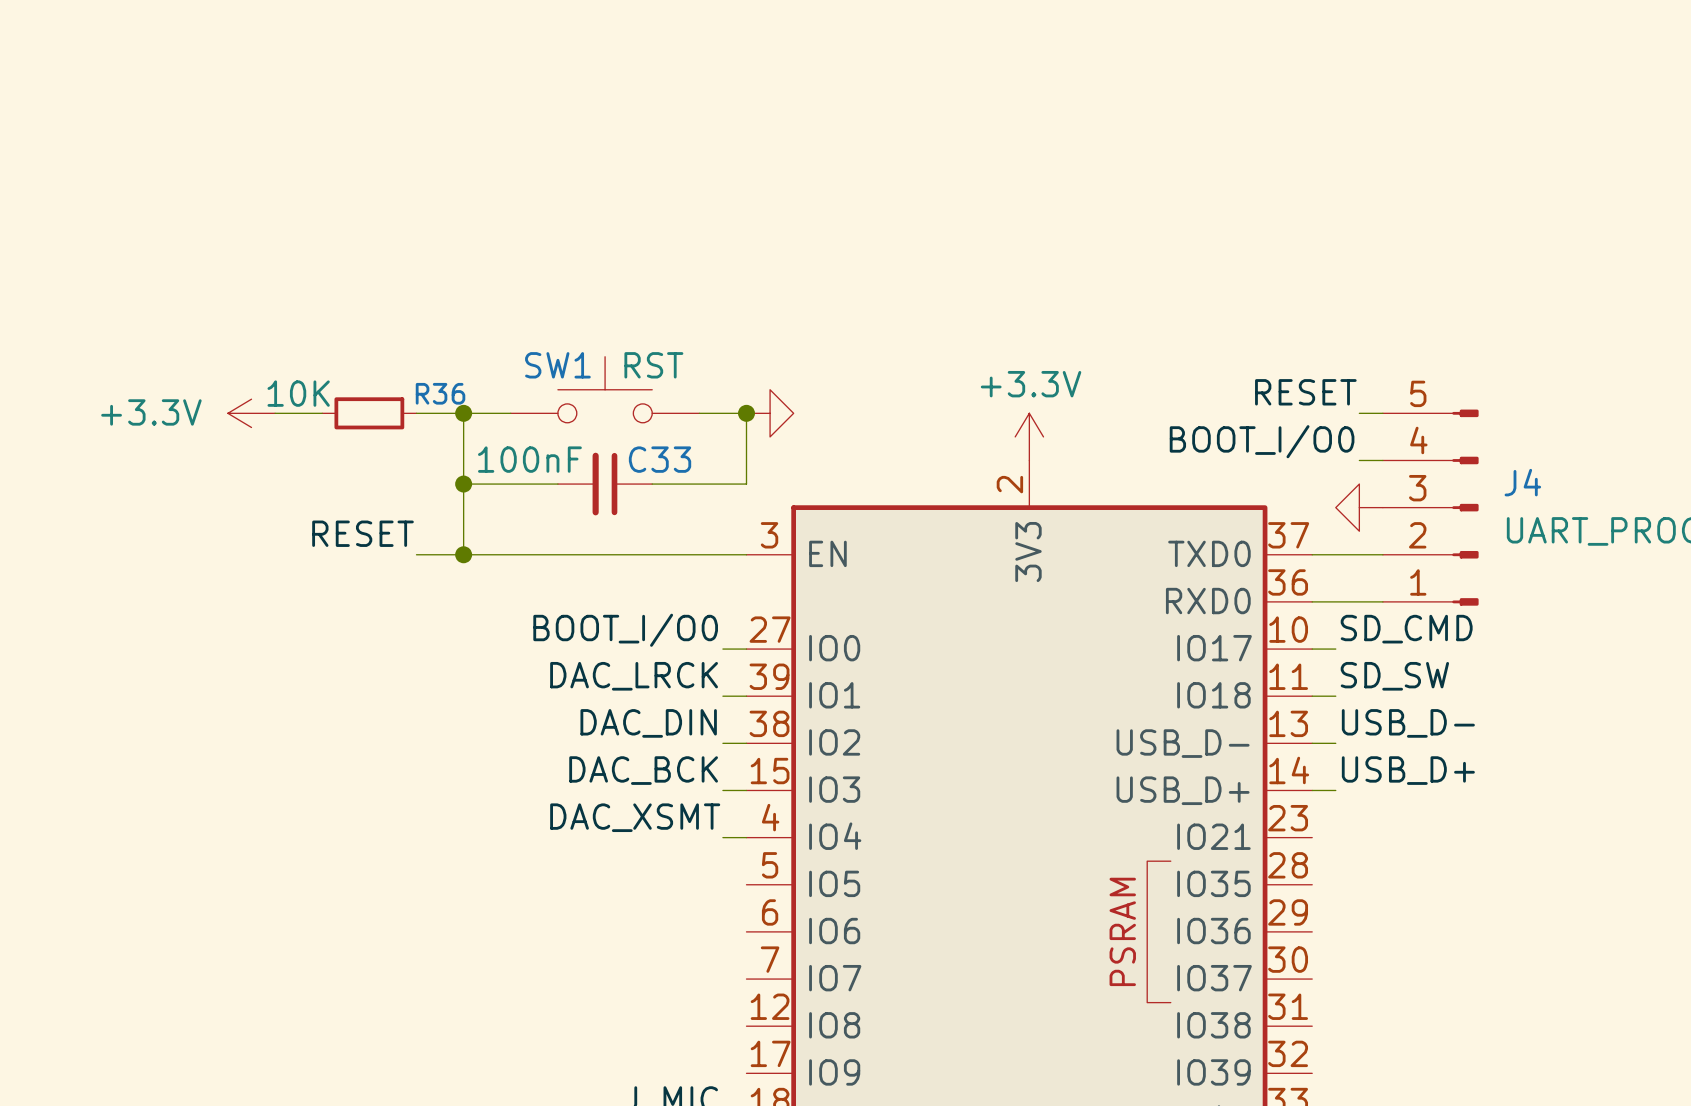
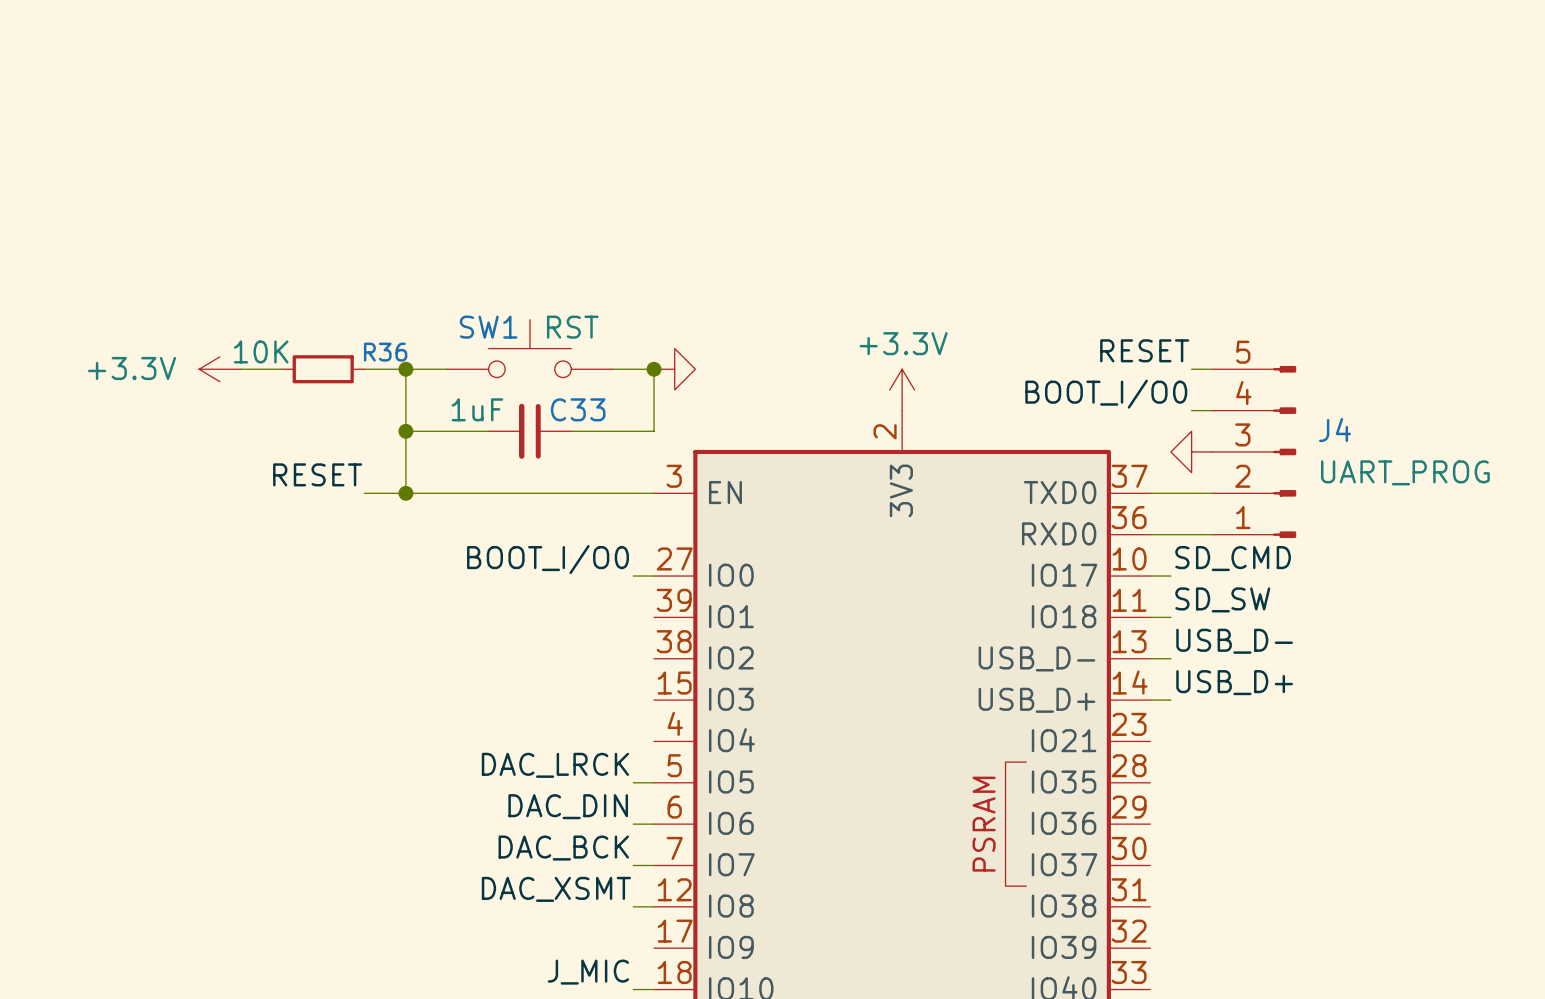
C33 value: 100nF (529, 459) -> 1uF (477, 409)
label position: DAC_LRCK (634, 676) -> DAC_LRCK (555, 765)
wire: (722, 696) (746, 696) -> (633, 906) (654, 906)
label position: DAC_DIN (648, 723) -> DAC_DIN (568, 806)
wire: (722, 743) (746, 743) -> (633, 865) (654, 865)
label position: DAC_BCK (643, 770) -> DAC_BCK (563, 848)
wire: (722, 790) (746, 790) -> (633, 824) (654, 824)
label position: DAC_XSMT (635, 817) -> DAC_XSMT (556, 889)
wire: (722, 837) (746, 837) -> (633, 782) (654, 782)

